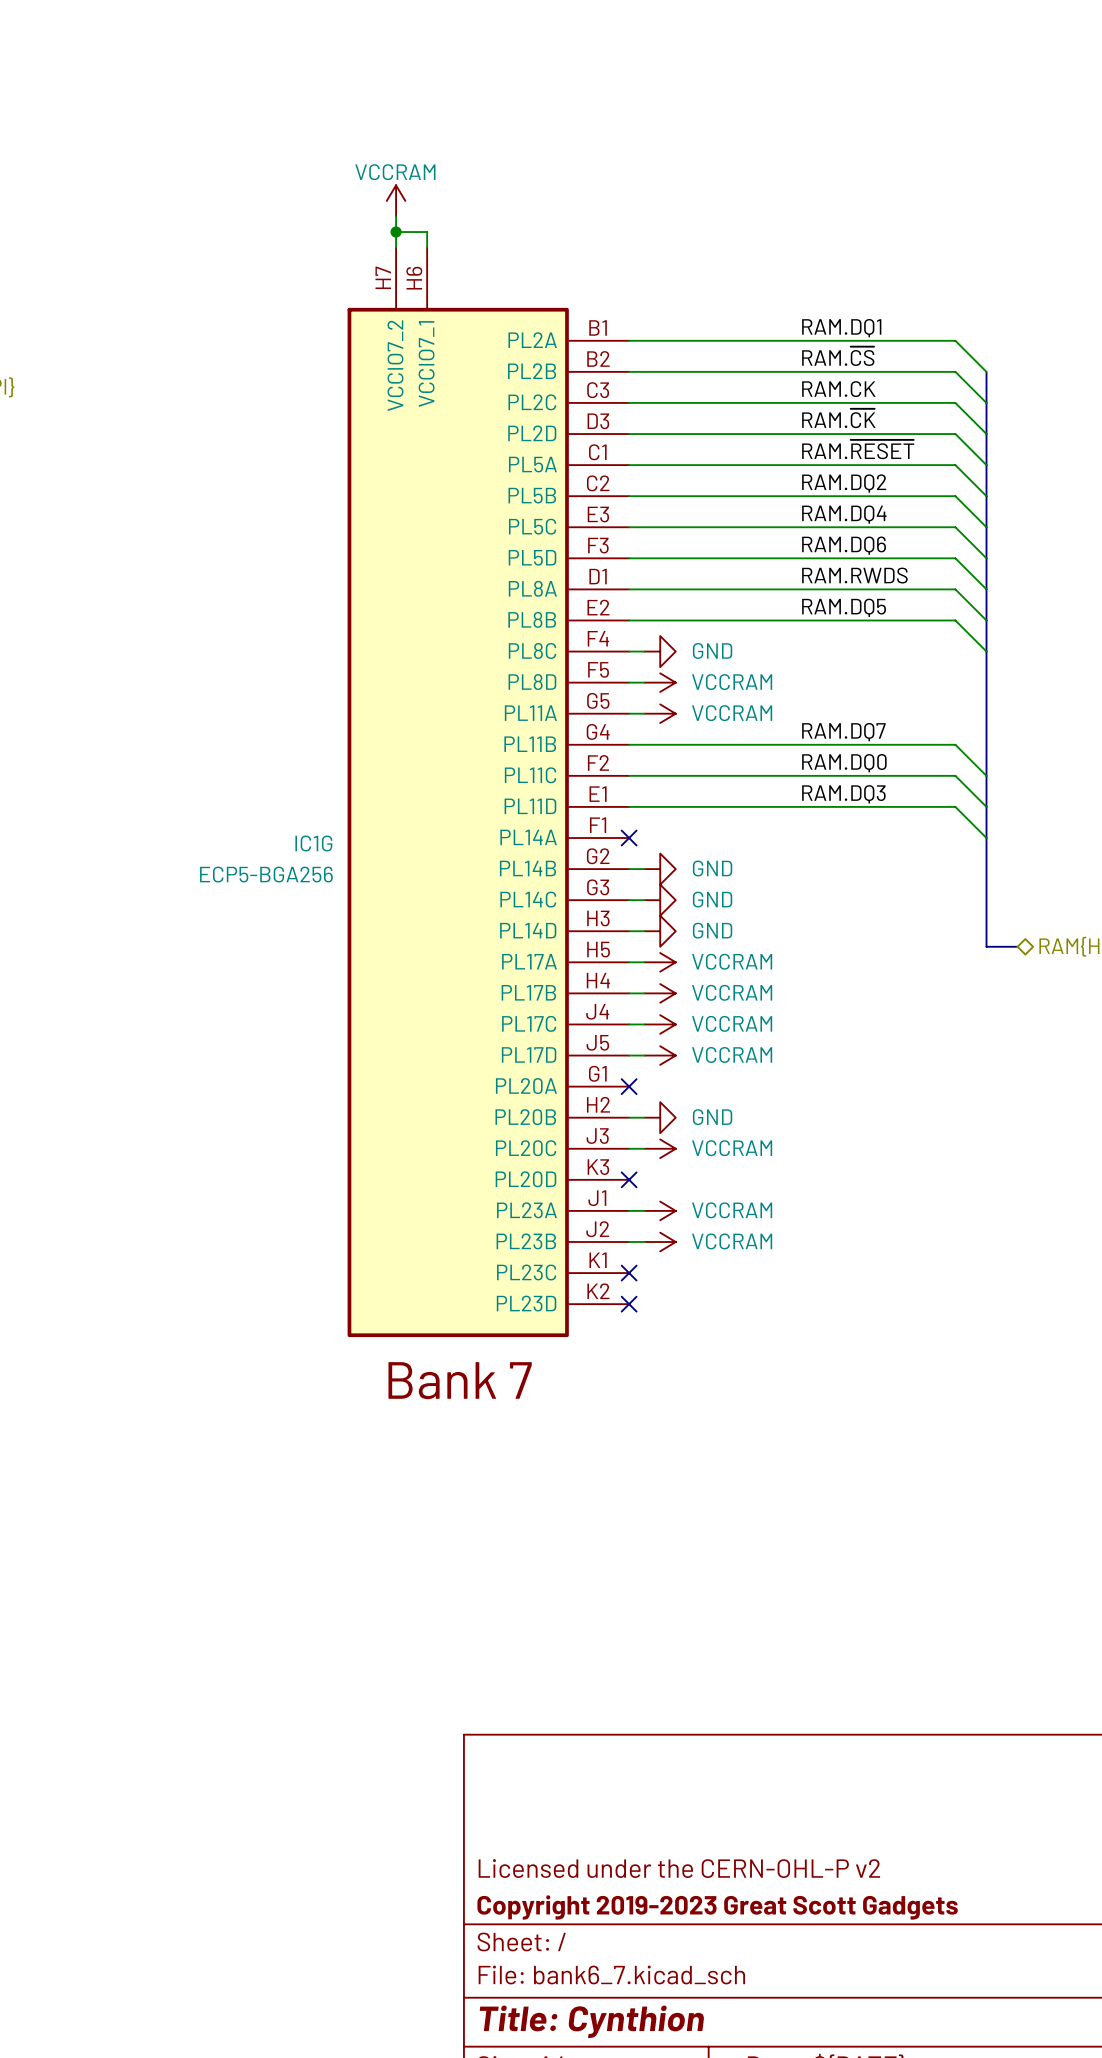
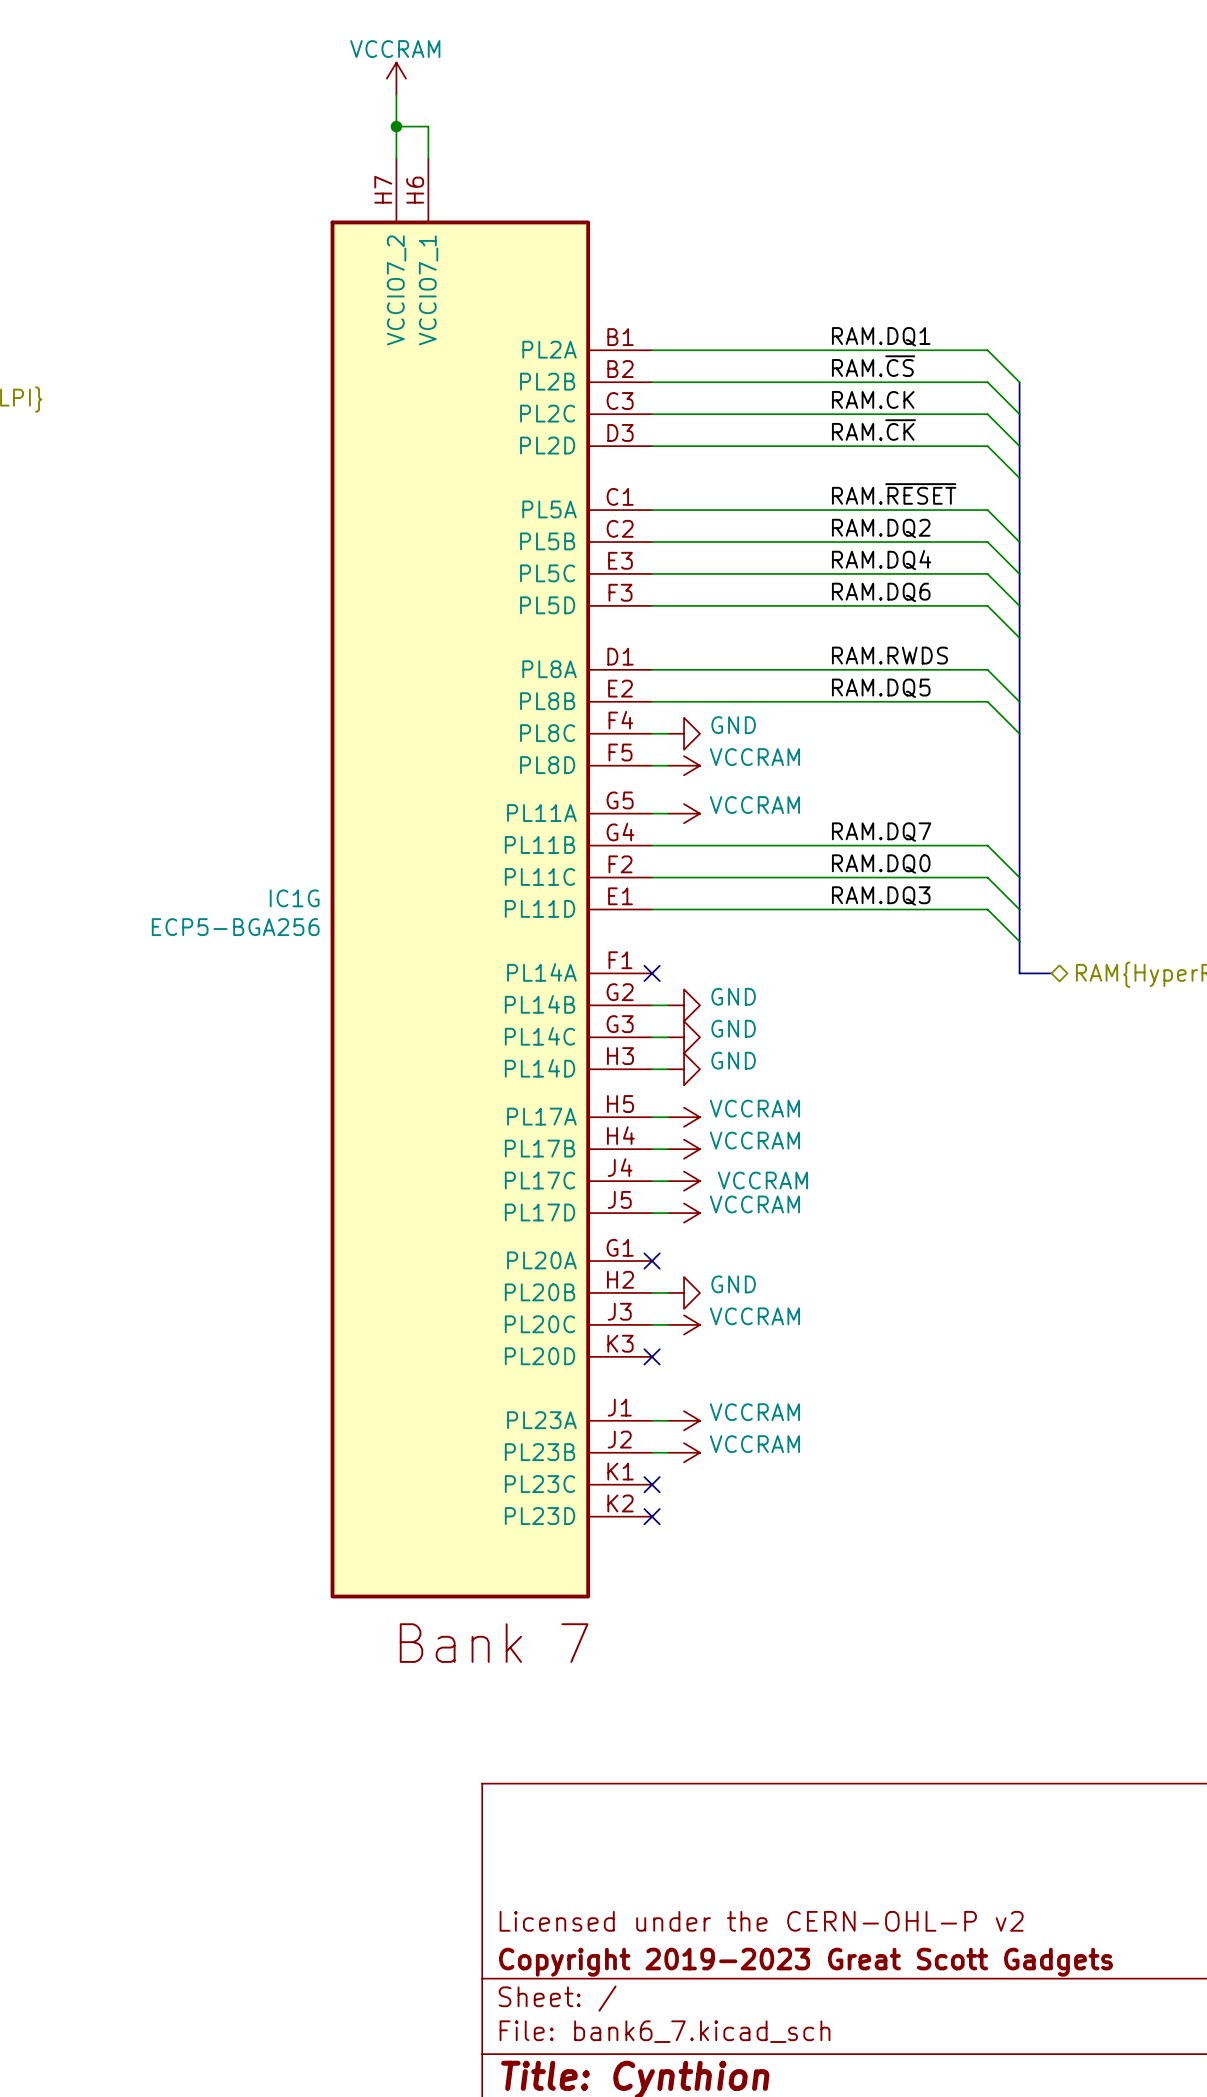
wire: none -> (396, 94) (396, 158)
wire: none -> (396, 126) (428, 126) (428, 158)
junction: none -> (396, 126)
power symbol position: VCCRAM (396, 200) -> VCCRAM (396, 78)
junction: (396, 232) -> none
IC1G symbol: [347, 247, 630, 1338] -> [330, 158, 653, 1599]
label: RAM.~{RESET} (858, 449) -> none
wire: (629, 465) (955, 465) (986, 496) -> none
label: RAM.DQ2 (844, 483) -> RAM.~{RESET} (894, 493)
label: RAM.DQ4 (844, 514) -> RAM.DQ2 (881, 528)
label: RAM.DQ6 (844, 545) -> RAM.DQ4 (881, 560)
label: RAM.RWDS (854, 575) -> RAM.DQ6 (881, 592)
label position: RAM.DQ5 (844, 607) -> RAM.DQ5 (881, 688)
wire: (629, 620) (955, 620) (986, 651) -> (652, 909) (987, 909) (1019, 941)
label: none -> RAM.RWDS (889, 655)
wire: none -> (668, 669) (987, 669) (1019, 701)
power symbol: GND (660, 651) -> none
power symbol: VCCRAM (660, 682) -> none
power symbol: VCCRAM (660, 713) -> GND (684, 733)
label position: RAM.DQ7 (843, 732) -> RAM.DQ7 (881, 832)
wire: (644, 744) (955, 744) (986, 775) -> (668, 701) (987, 701) (1019, 733)
power symbol: none -> VCCRAM (684, 765)
label position: RAM.DQ0 (844, 763) -> RAM.DQ0 (881, 864)
wire: (629, 775) (955, 775) (986, 806) -> (652, 845) (987, 845) (1019, 877)
power symbol: none -> VCCRAM (684, 813)
label position: RAM.DQ3 (843, 794) -> RAM.DQ3 (881, 896)
wire: (629, 806) (955, 806) (986, 838) -> (652, 877) (987, 877) (1019, 909)
no-connect mark: (629, 838) -> none
IC1G name position: IC1G (313, 843) -> IC1G (294, 898)
wire: (629, 869) (644, 869) -> none
power symbol: GND (660, 869) -> none
IC1G value position: ECP5-BGA256 (266, 874) -> ECP5-BGA256 (235, 927)
wire: (629, 900) (644, 900) -> (652, 1117) (668, 1117)
power symbol: GND (660, 900) -> none
wire: (629, 931) (644, 931) -> (652, 1005) (668, 1005)
power symbol: GND (660, 931) -> none
no-connect mark: none -> (652, 973)
wire: (629, 962) (644, 962) -> (652, 1037) (668, 1037)
power symbol: VCCRAM (660, 962) -> none
power symbol: none -> GND (684, 1005)
wire: (629, 993) (644, 993) -> (652, 1069) (668, 1069)
power symbol: VCCRAM (660, 993) -> none
power symbol: none -> GND (684, 1037)
wire: (629, 1024) (644, 1024) -> (652, 813) (668, 813)
power symbol: VCCRAM (660, 1024) -> none
power symbol: none -> GND (684, 1069)
wire: (629, 1055) (644, 1055) -> (652, 1213) (668, 1213)
power symbol: VCCRAM (660, 1055) -> none
no-connect mark: (629, 1086) -> none
power symbol: none -> VCCRAM (684, 1117)
power symbol: GND (660, 1117) -> VCCRAM (684, 1149)
no-connect mark: (629, 1179) -> none
power symbol: none -> VCCRAM (684, 1213)
wire: (629, 1210) (644, 1210) -> (652, 1292) (668, 1292)
power symbol: VCCRAM (660, 1210) -> none
no-connect mark: none -> (652, 1261)
wire: (629, 1242) (644, 1242) -> (652, 1324) (668, 1324)
power symbol: VCCRAM (660, 1242) -> none
power symbol: none -> GND (684, 1292)
no-connect mark: (629, 1273) -> none
power symbol: none -> VCCRAM (684, 1324)
no-connect mark position: (629, 1304) -> (652, 1356)
wire: none -> (652, 1420) (668, 1420)
power symbol: none -> VCCRAM (684, 1420)
wire: none -> (652, 1452) (668, 1452)
power symbol: none -> VCCRAM (684, 1452)
no-connect mark: none -> (652, 1484)
no-connect mark: none -> (652, 1516)

